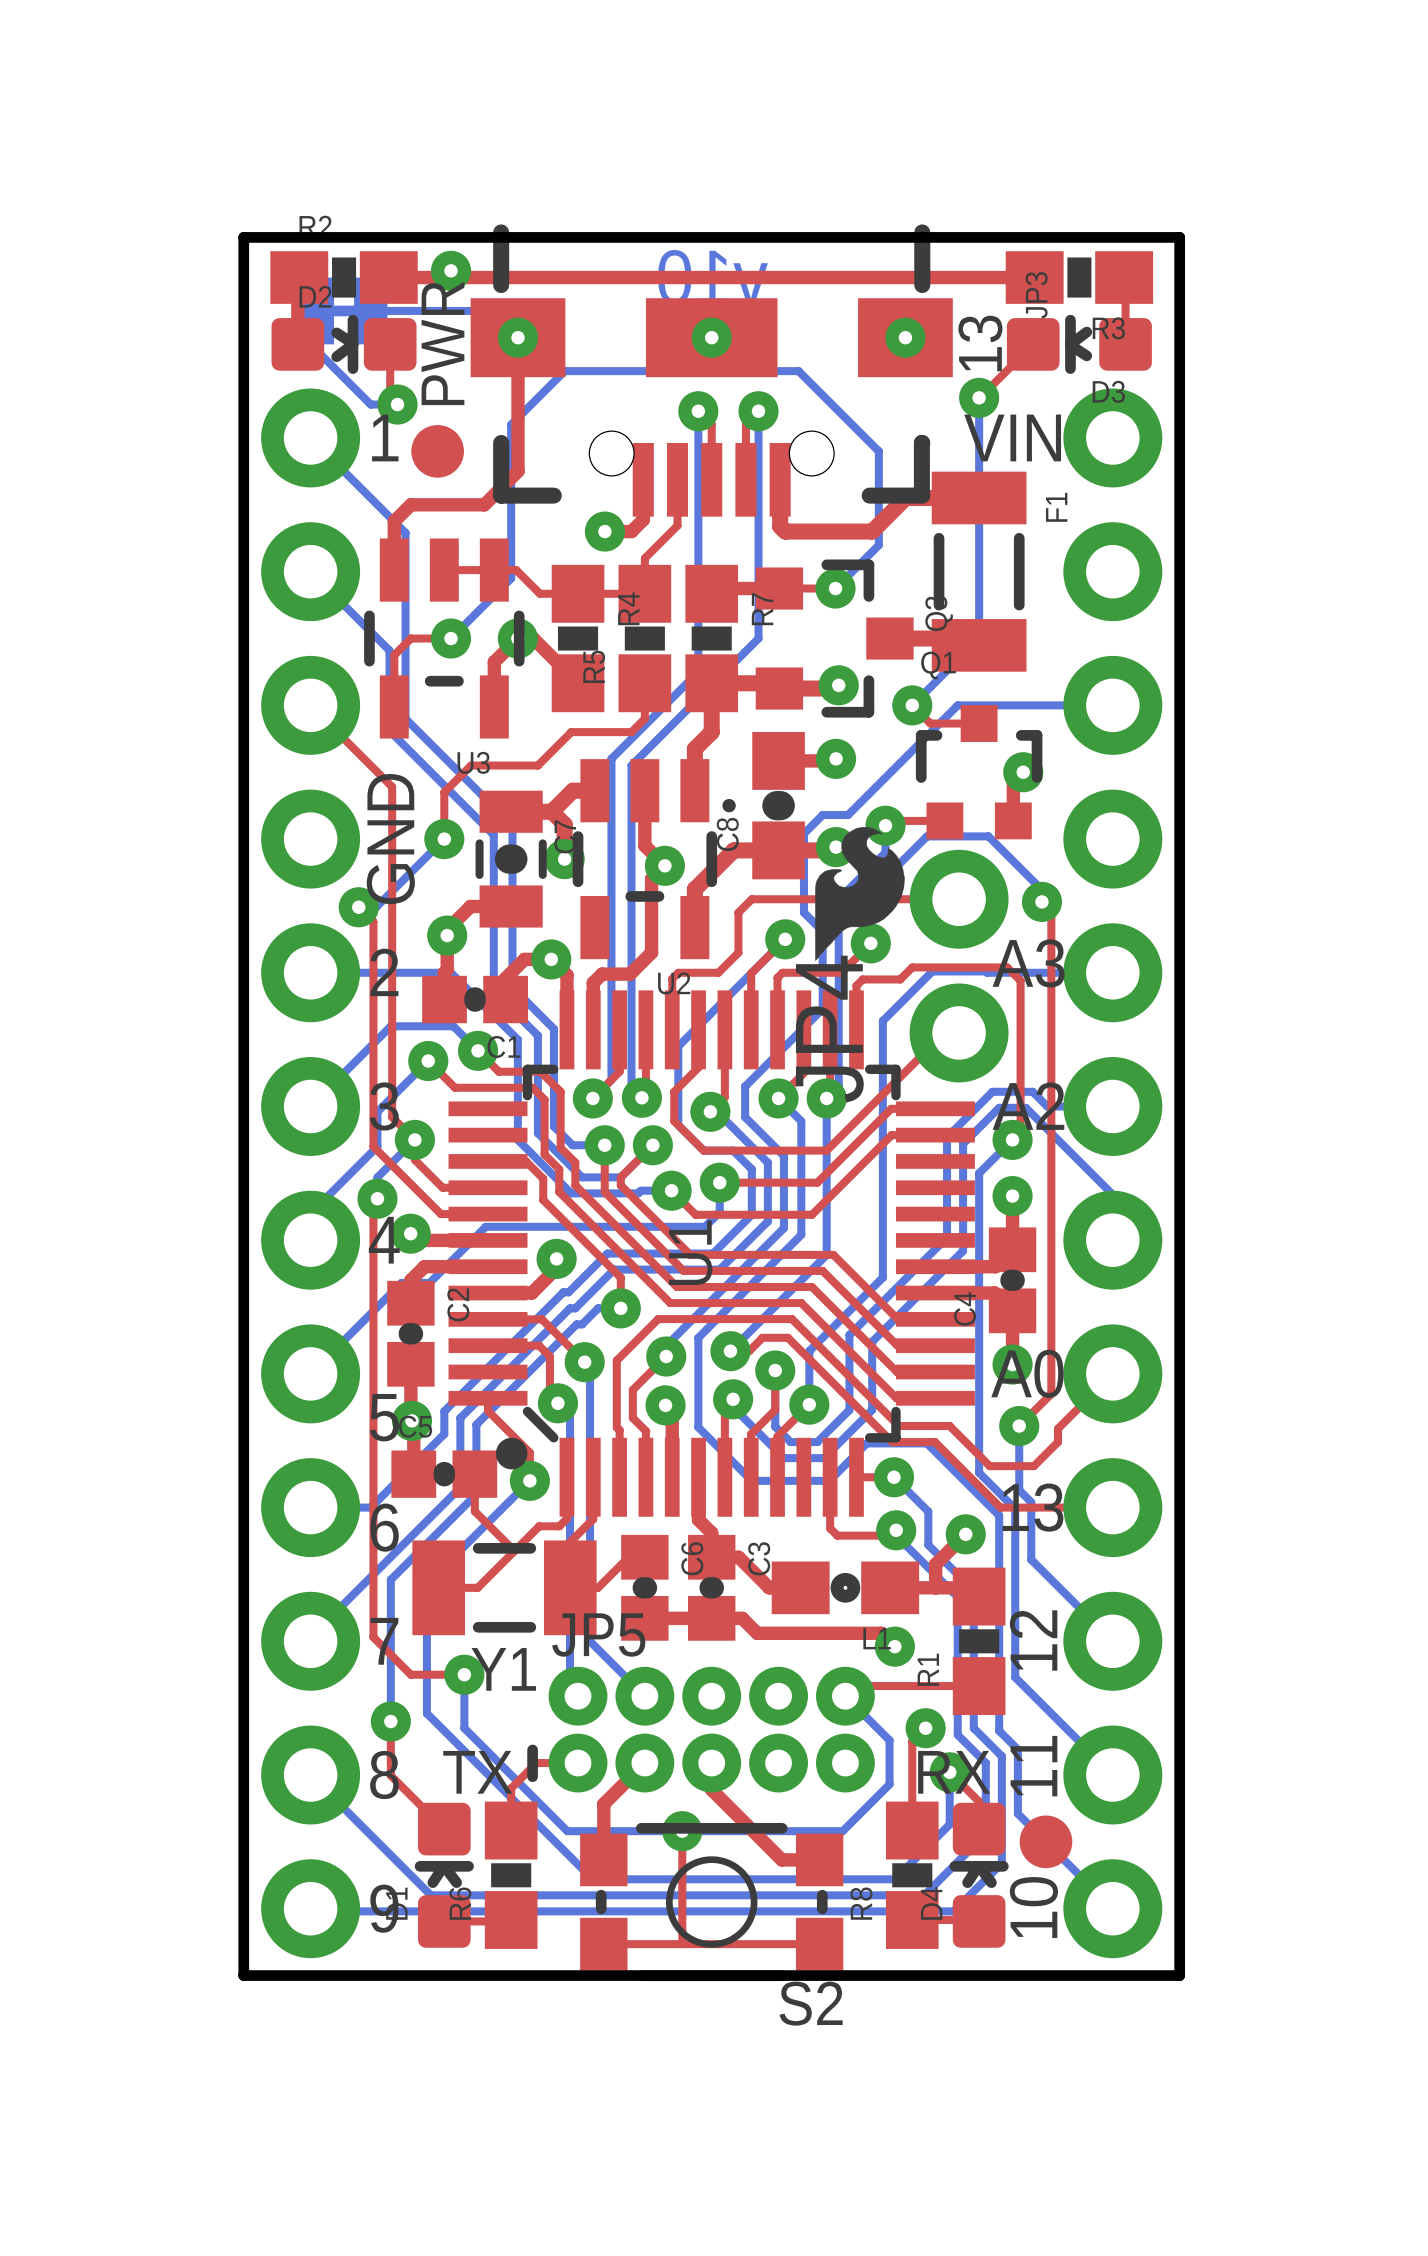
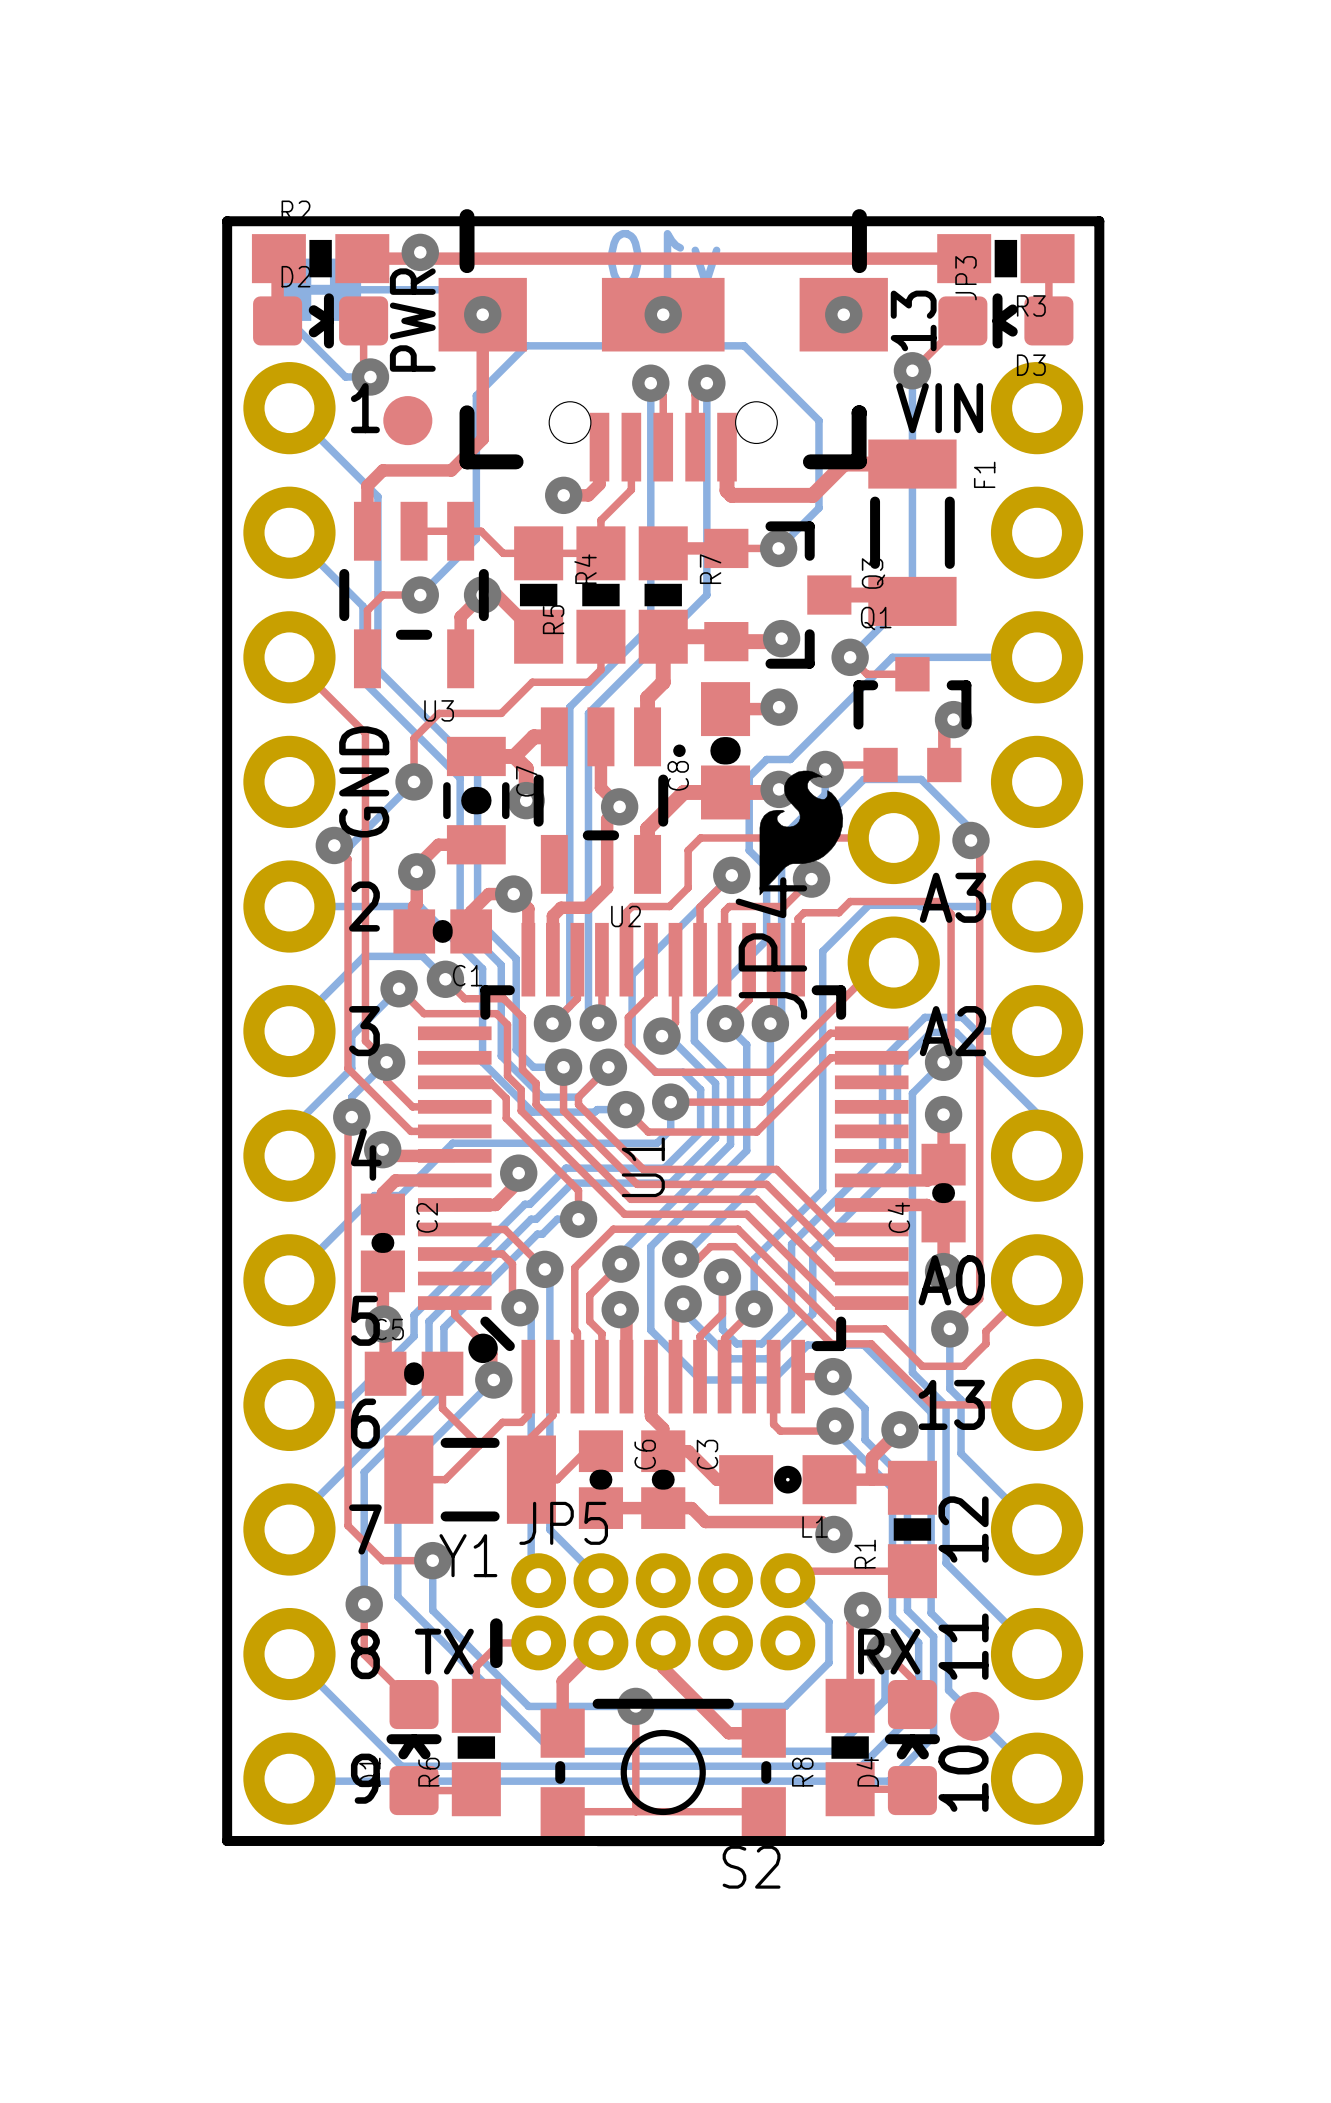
U1 footprint: [448, 990, 975, 1517] -> [417, 922, 909, 1414]
JP5 footprint: [527, 1666, 875, 1793] -> [490, 1553, 816, 1671]

